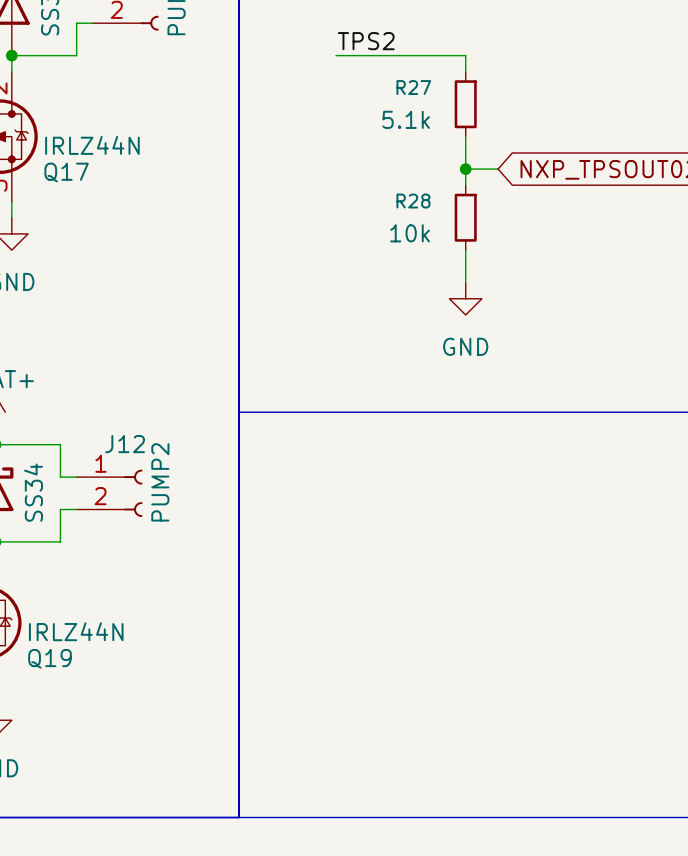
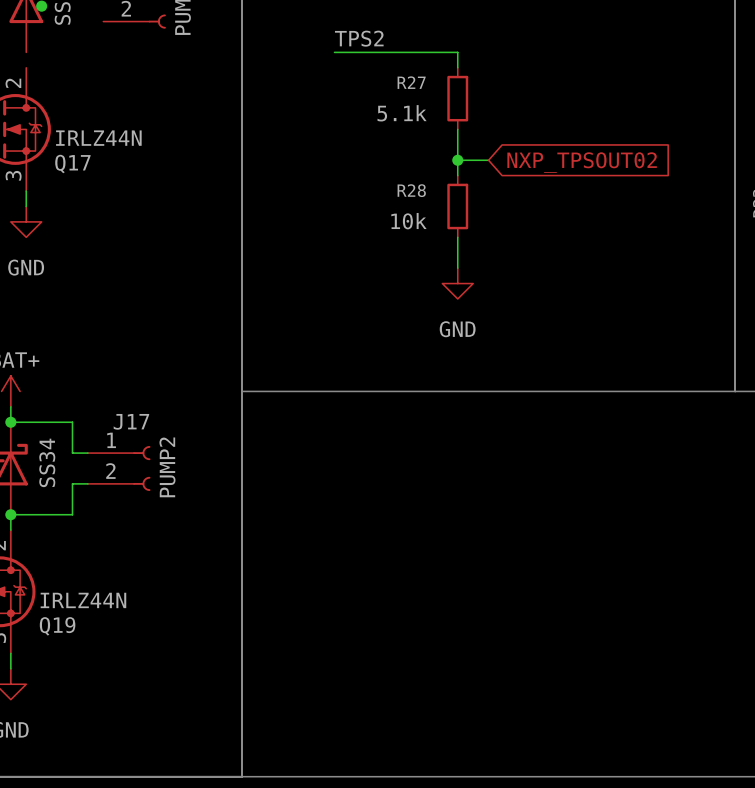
junction: none -> (41, 6)
wire: (92, 23) (76, 23) (76, 55) (11, 55) (11, 71) -> none
junction: (11, 55) -> none
J12 name: J12 (125, 444) -> J17 (131, 421)

